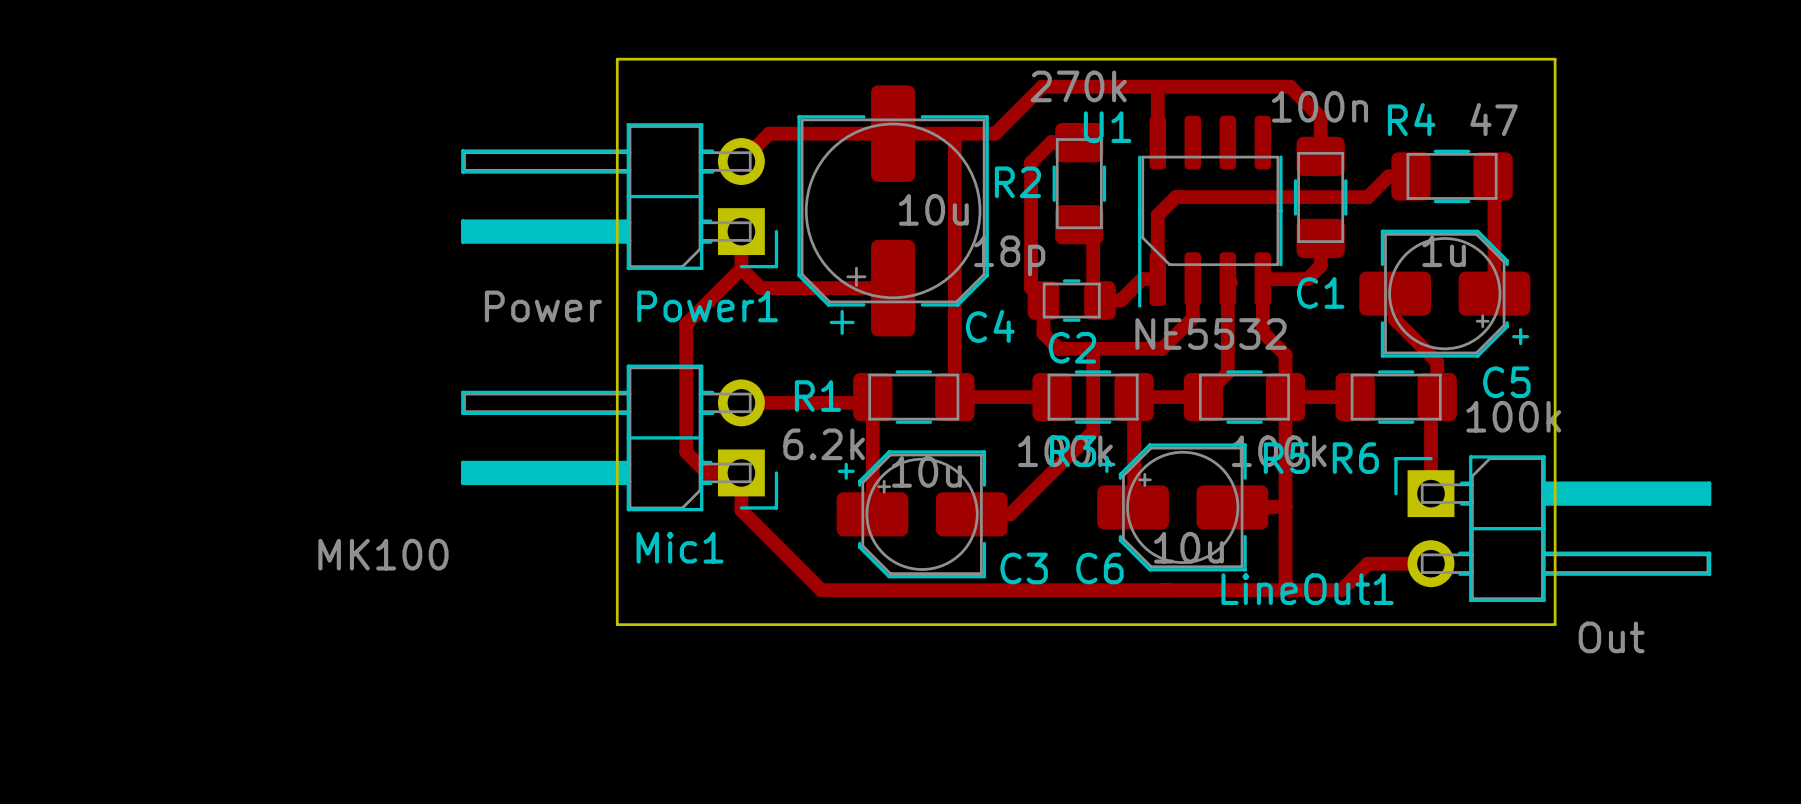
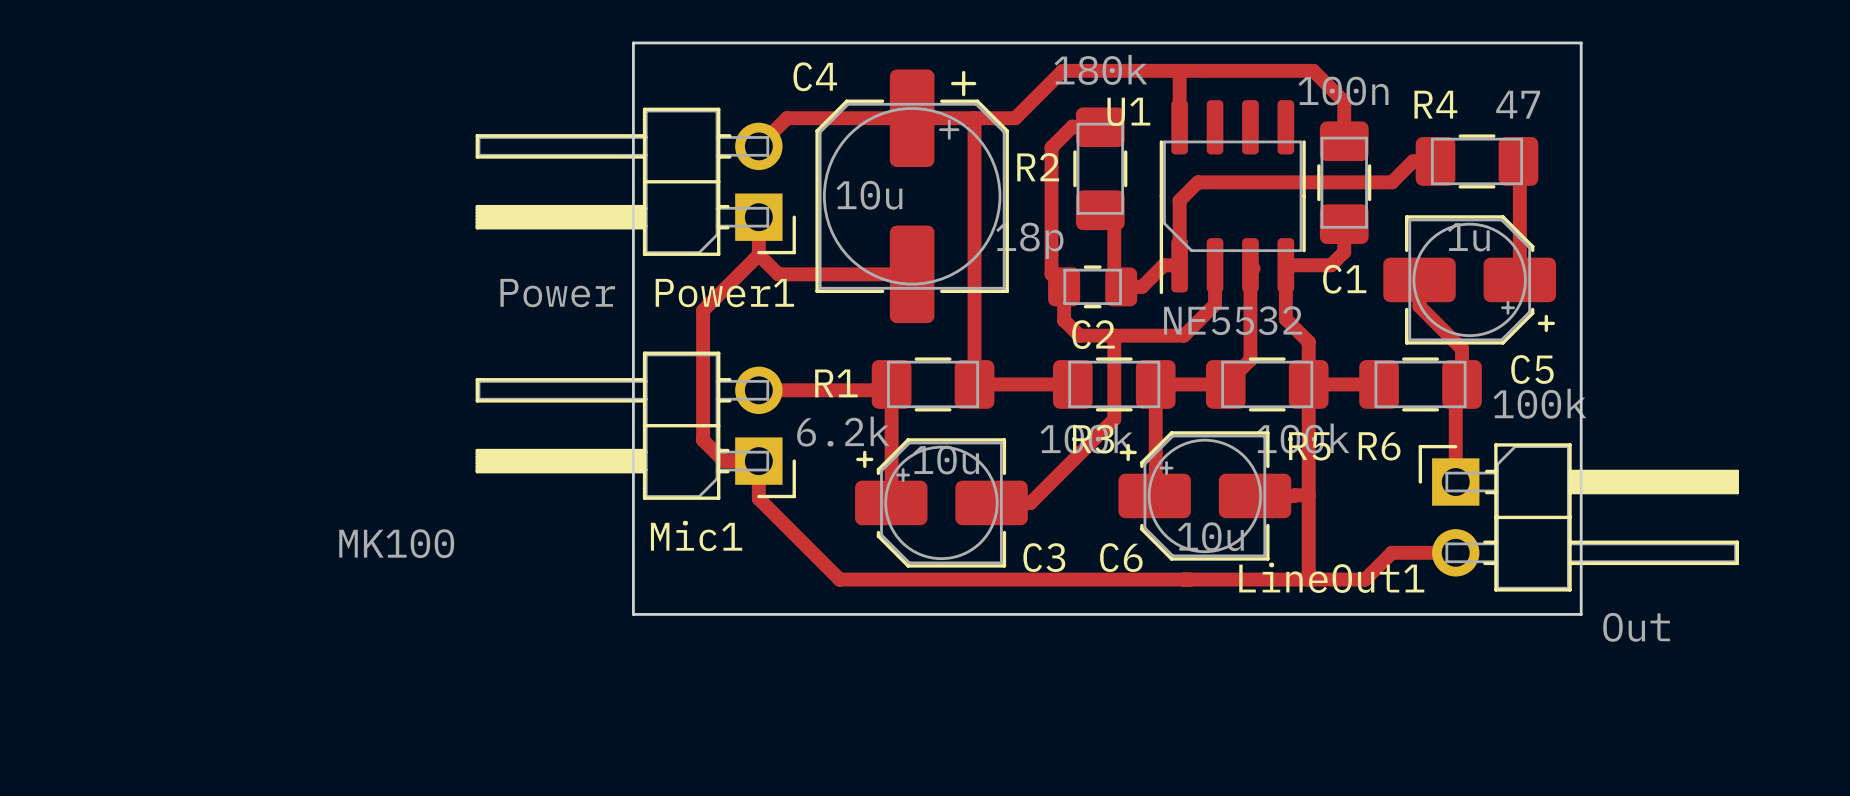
C4 footprint: [797, 85, 989, 337] -> [815, 69, 1009, 324]
R2 value: 270k (1078, 86) -> 180k (1100, 69)
C4 value position: 10u (933, 209) -> 10u (869, 195)
C4 name position: C4 (990, 326) -> C4 (815, 76)

